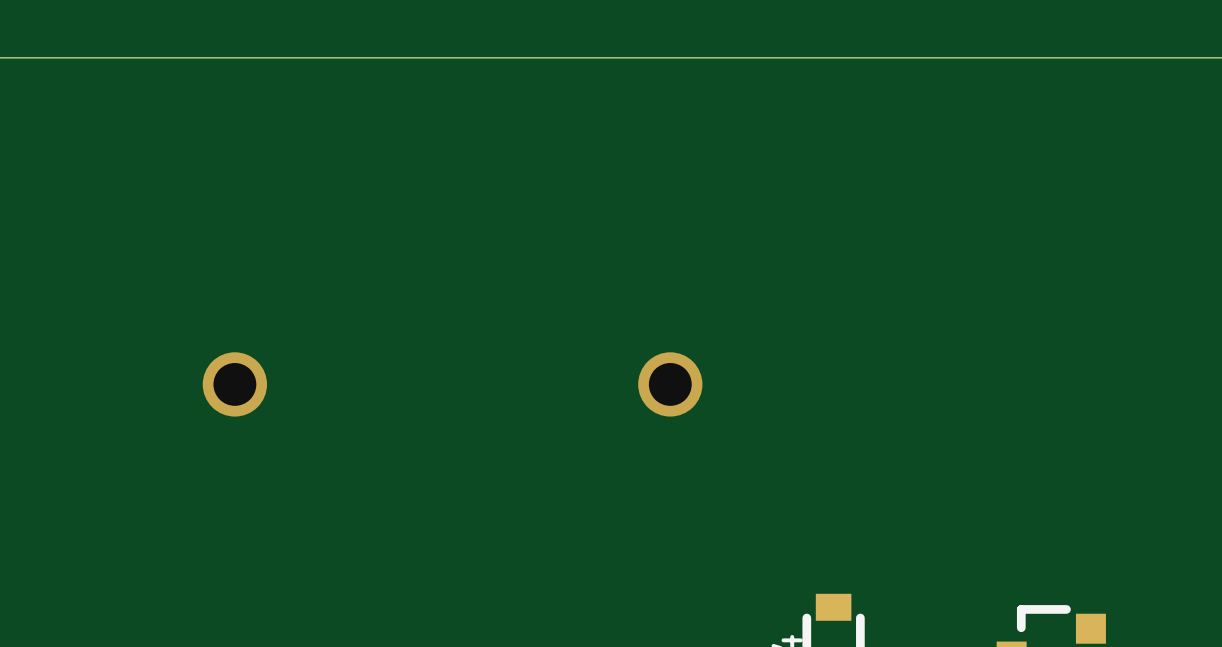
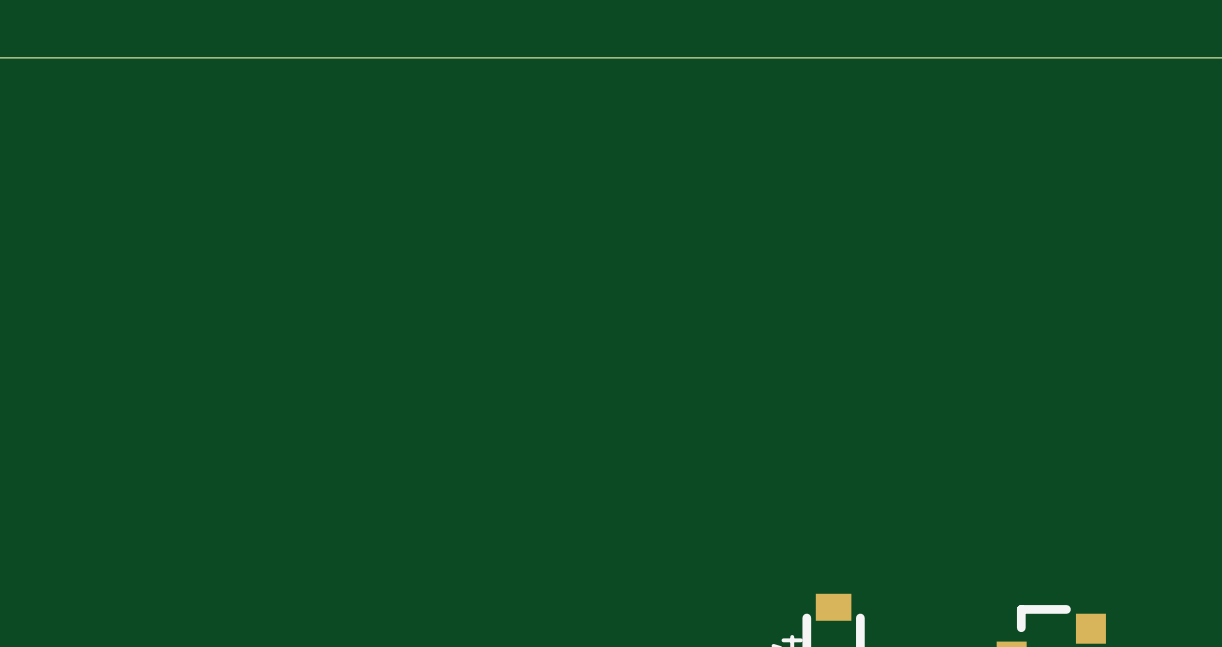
via: (234, 384) -> none
via: (670, 384) -> none

